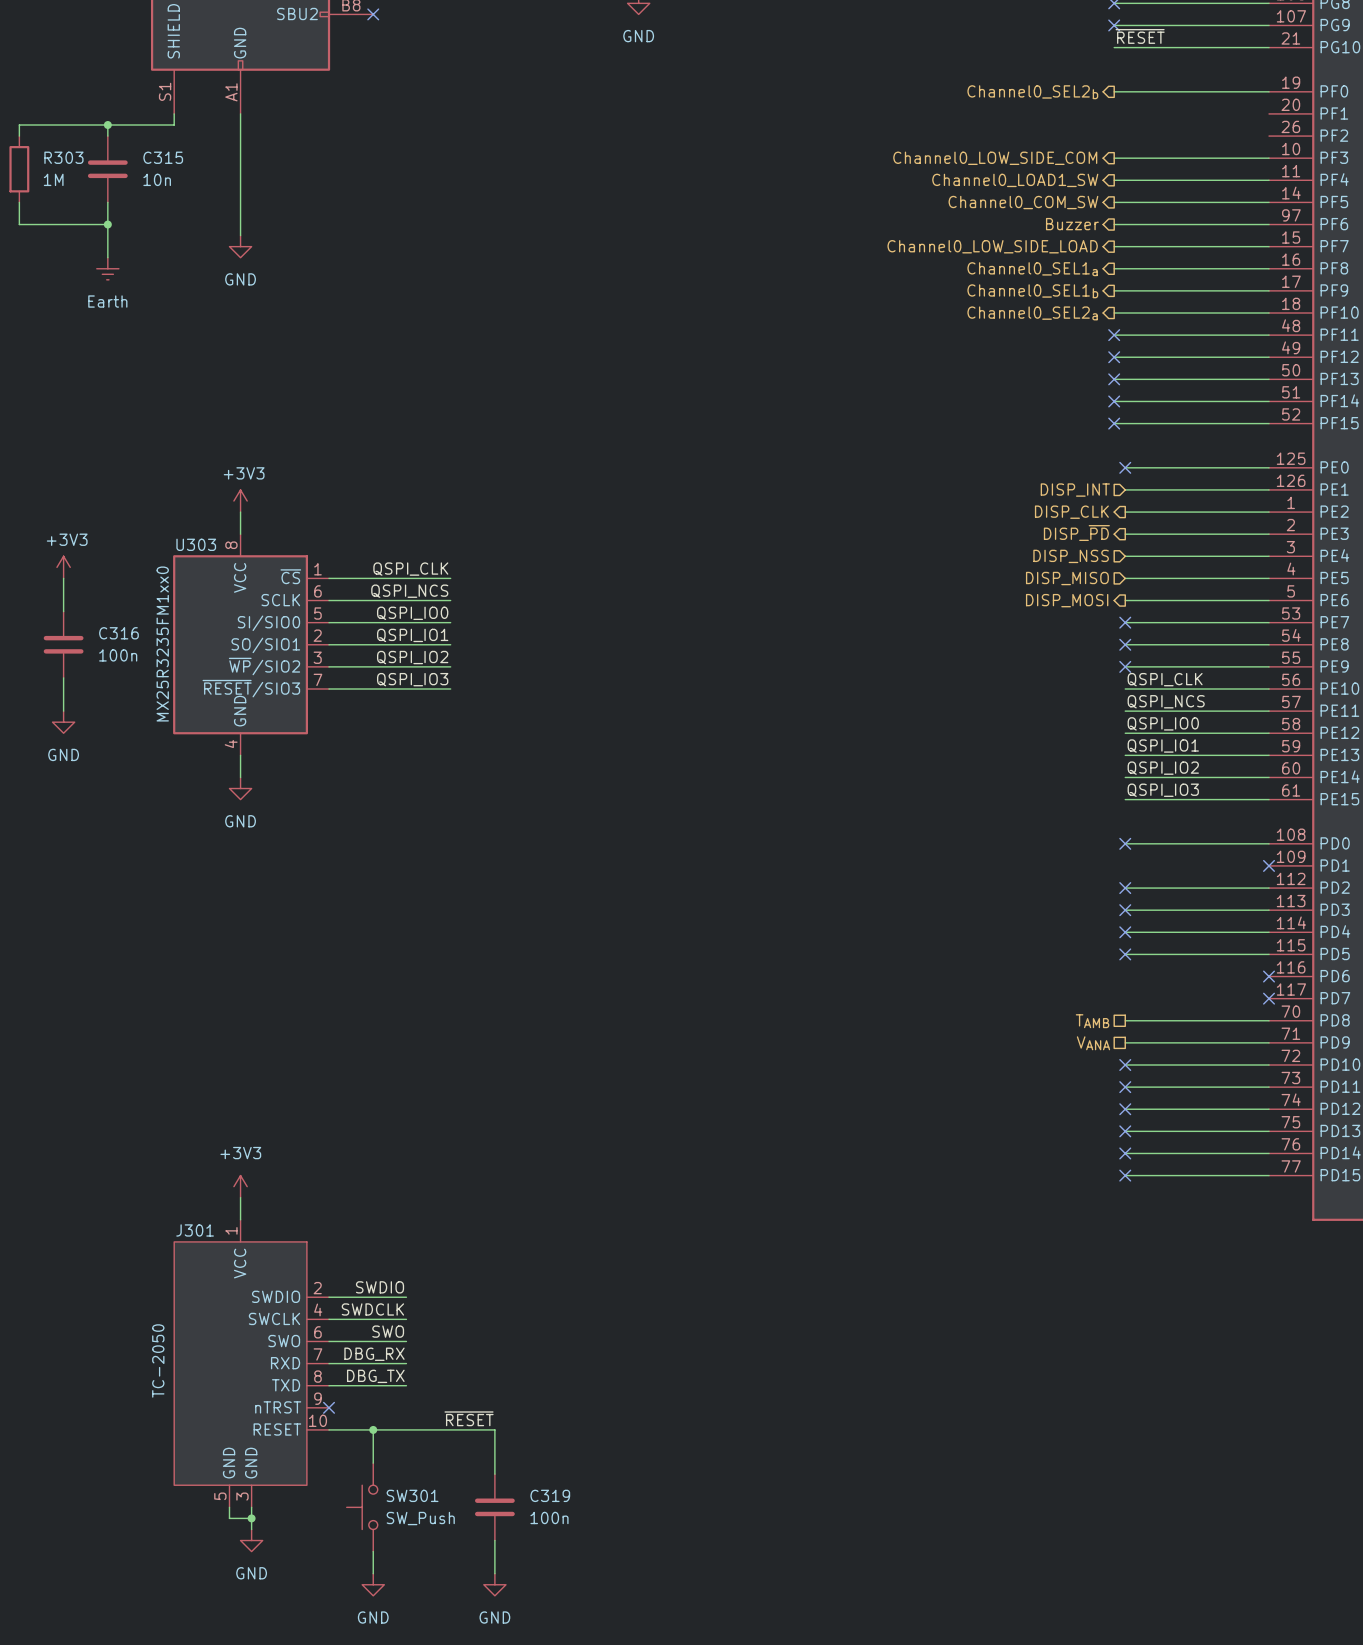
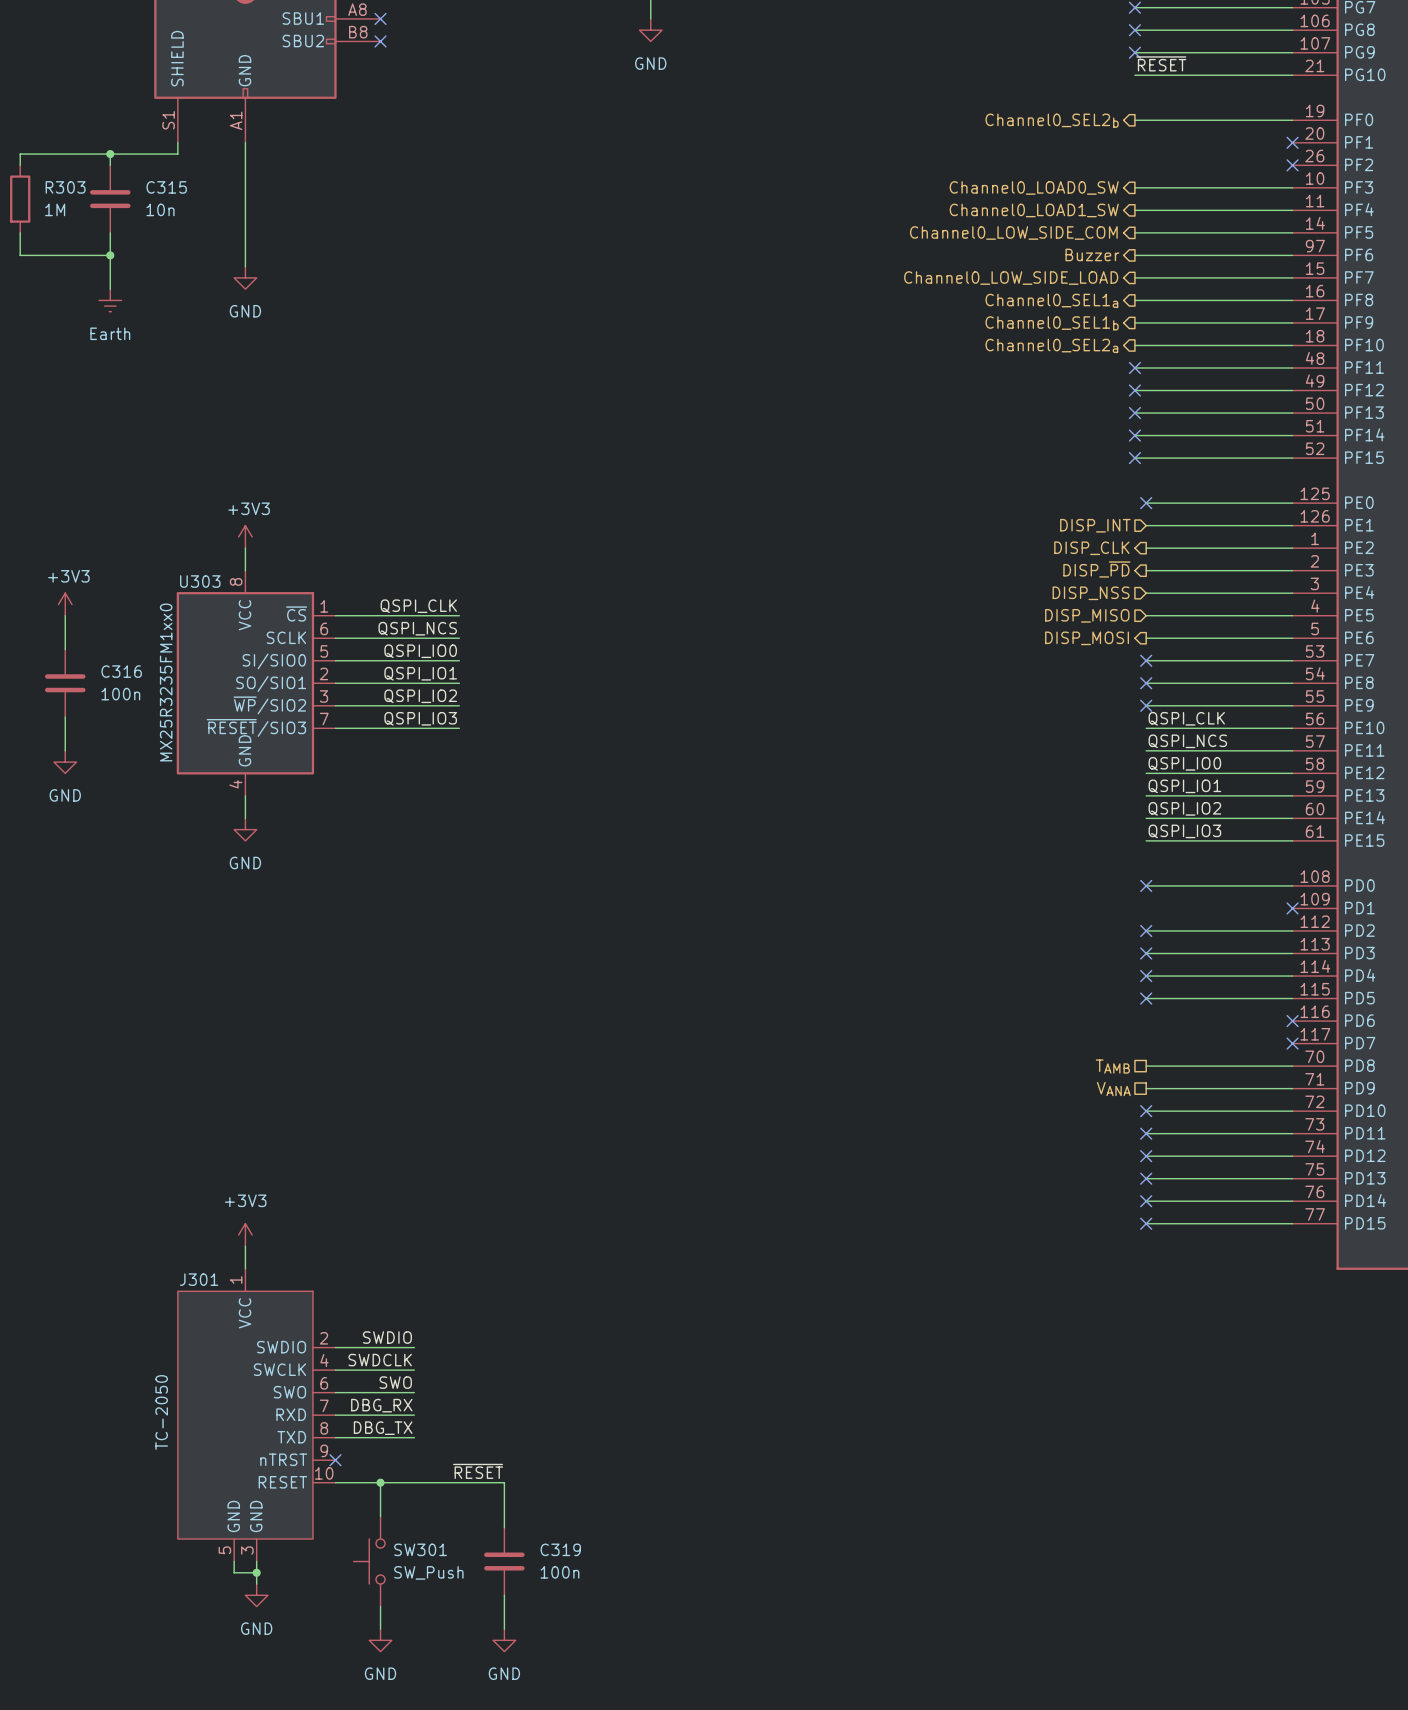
no-connect mark: none -> (1292, 142)
no-connect mark: none -> (1292, 165)
hierarchical label: Channel0_LOW_SIDE_COM (995, 158) -> Channel0_LOAD0_SW (1034, 187)
hierarchical label: Channel0_COM_SW (1023, 202) -> Channel0_LOW_SIDE_COM (1013, 232)

